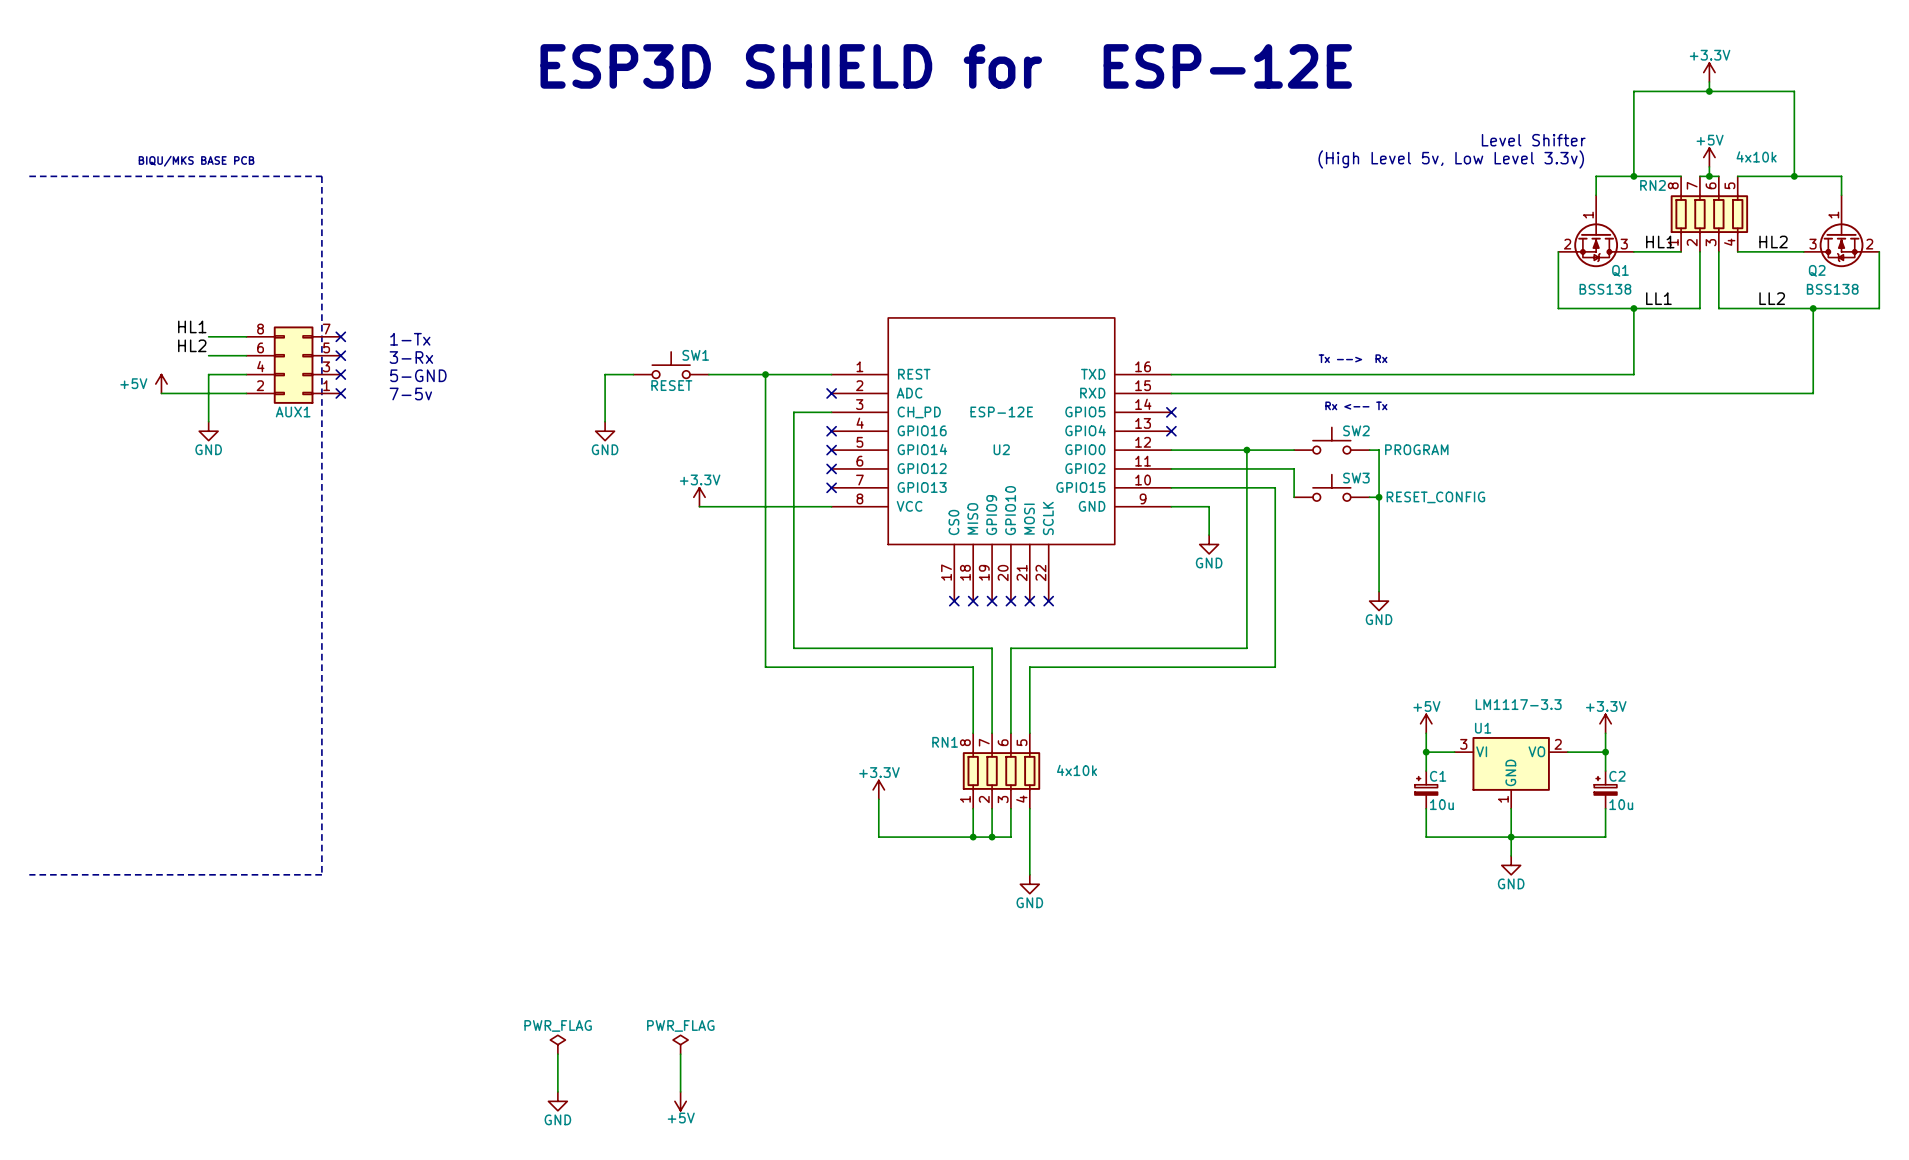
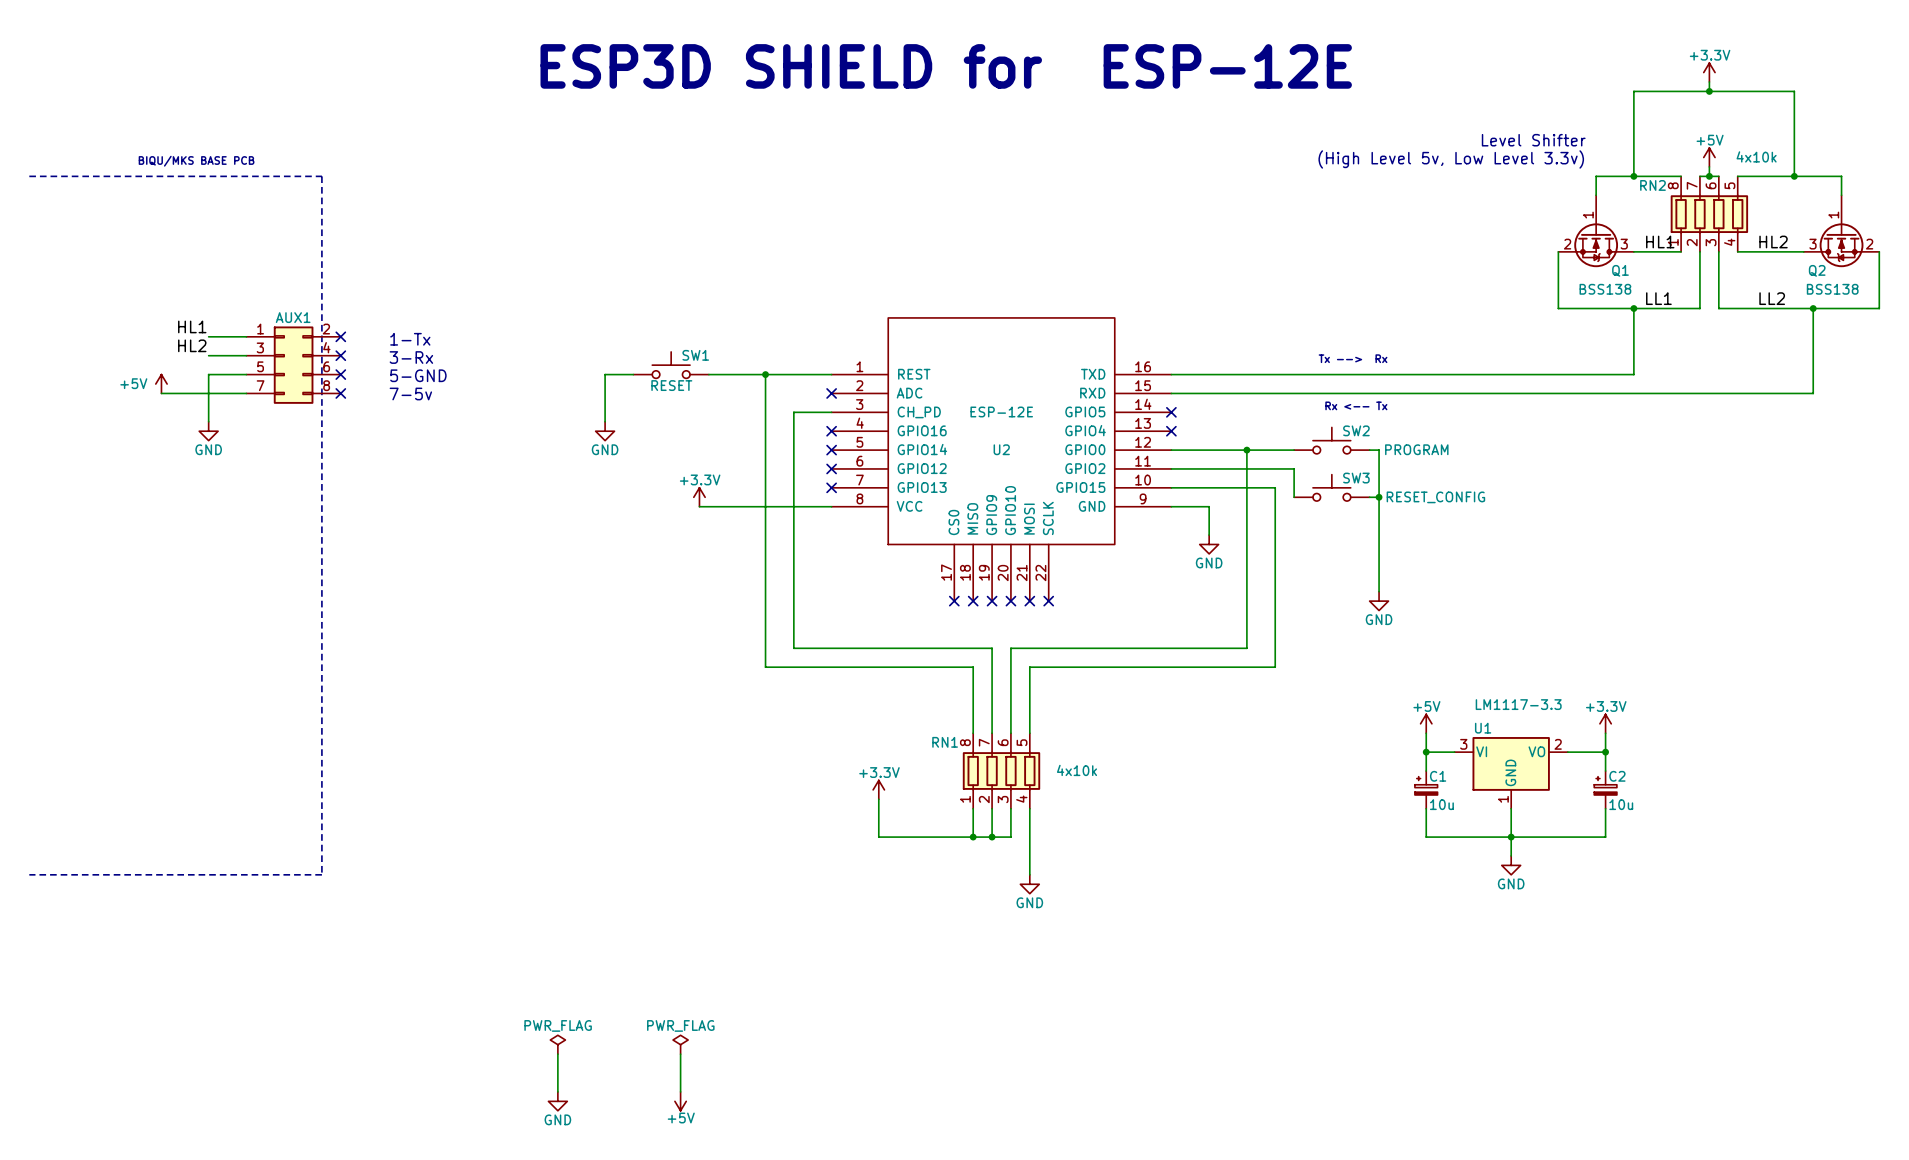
AUX1 rotation: 0° (293, 365) -> 180° (293, 365)

